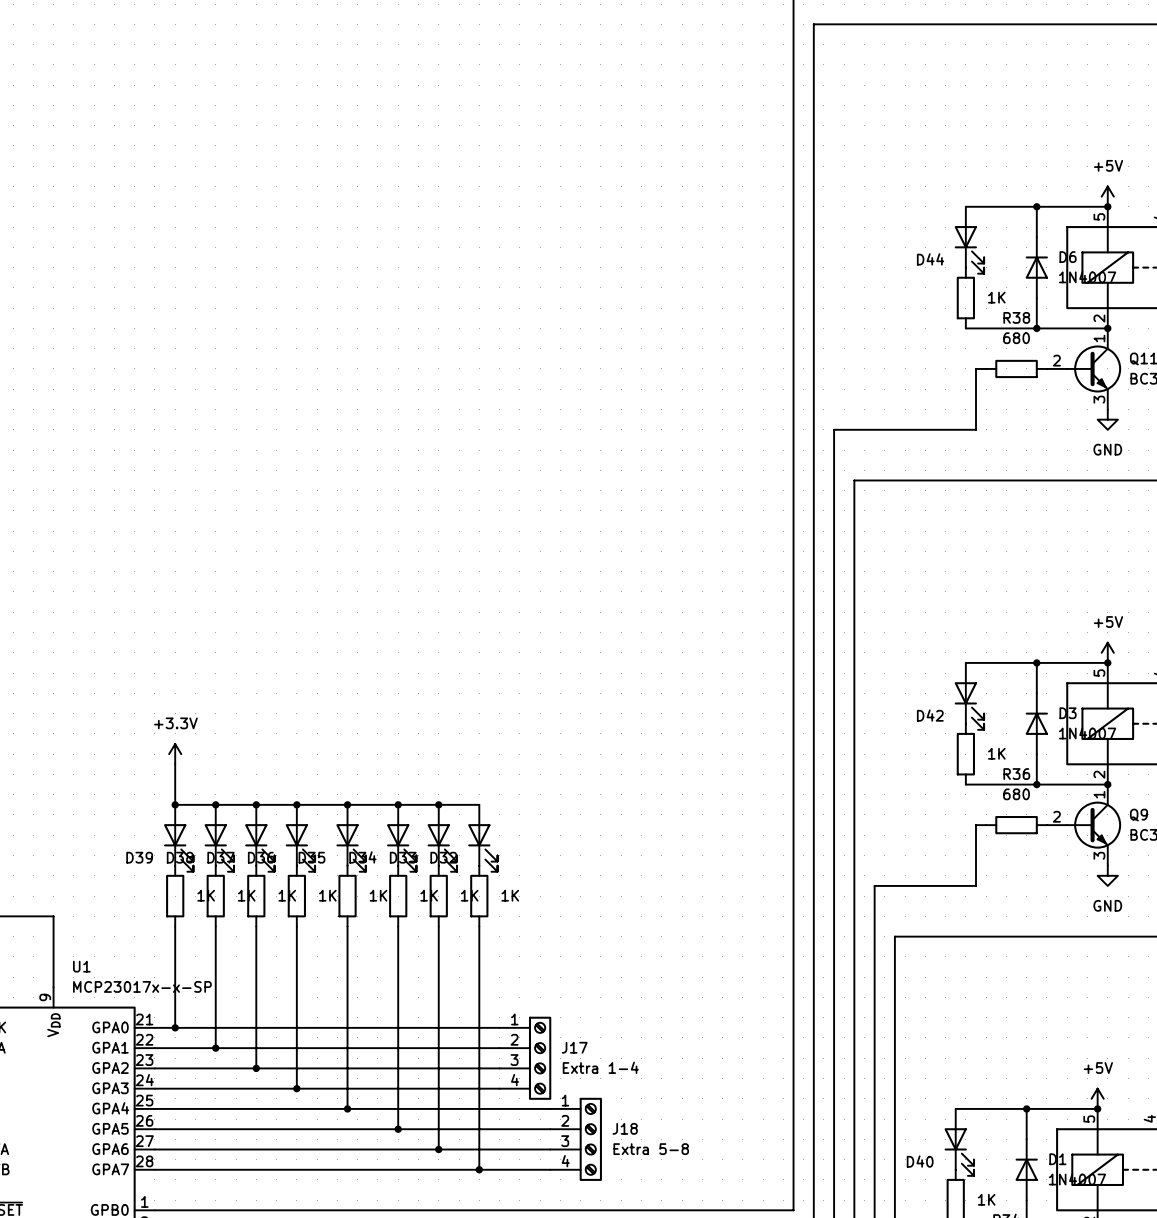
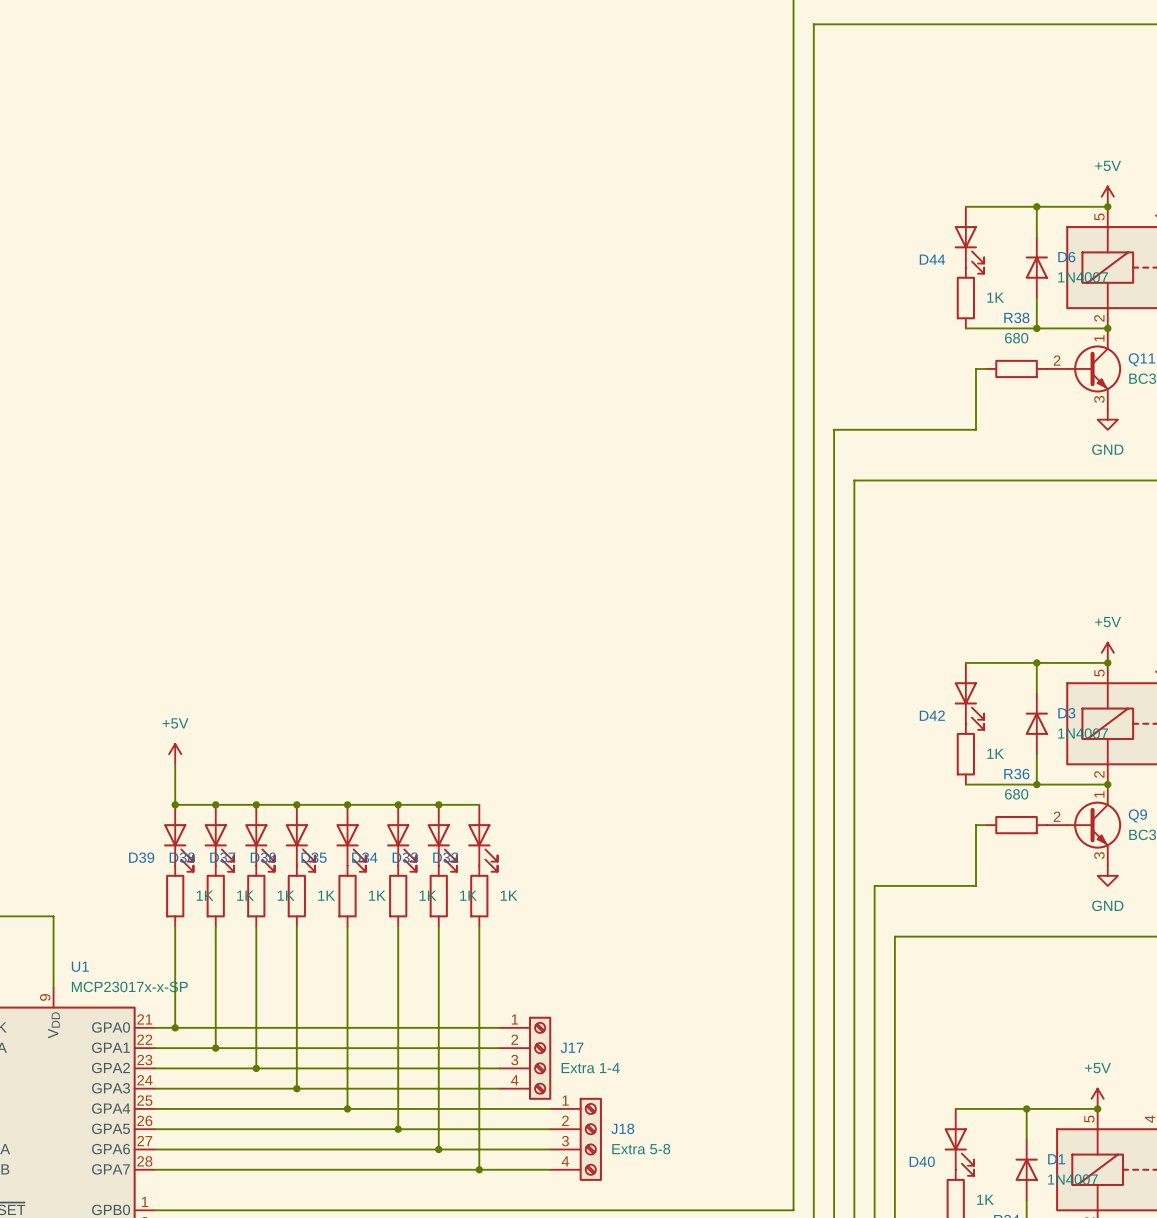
power symbol: +3.3V (175, 754) -> +5V (175, 754)

